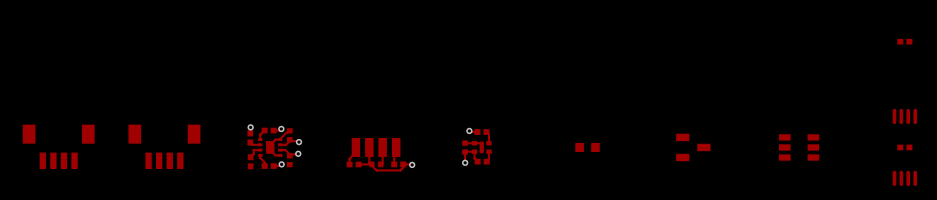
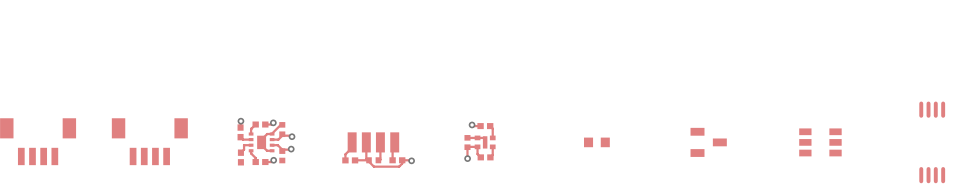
part: (904, 41) -> none
part: (904, 147) -> none

